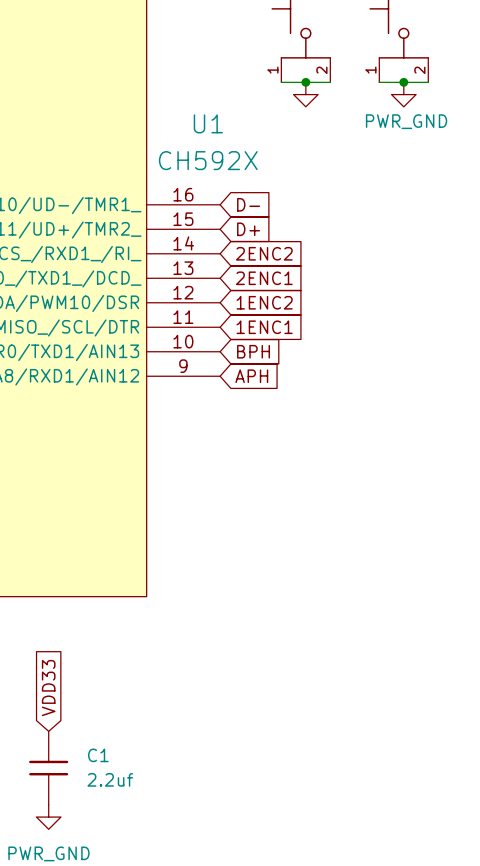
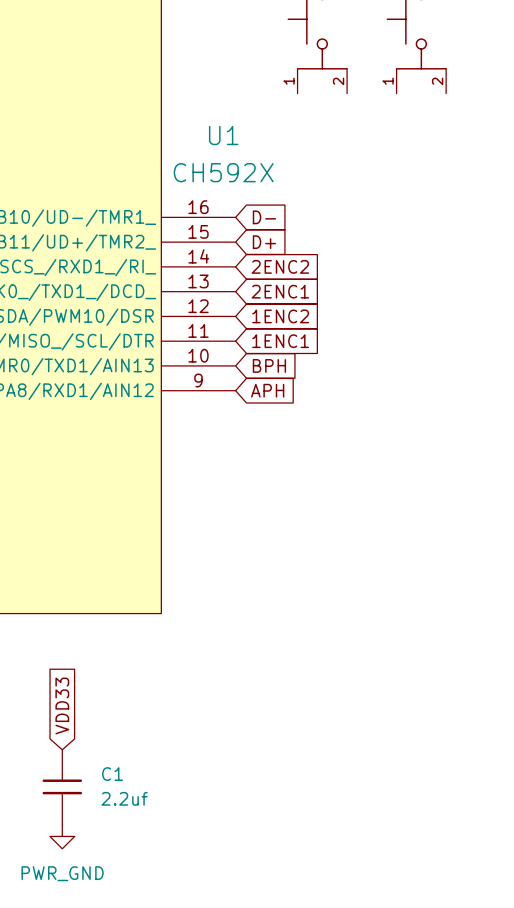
wire: (281, 82) (330, 82) -> none
junction: (305, 82) -> none
wire: (379, 82) (428, 82) -> none
junction: (403, 82) -> none
power symbol: (305, 94) -> none
power symbol: PWR_GND (403, 94) -> none

